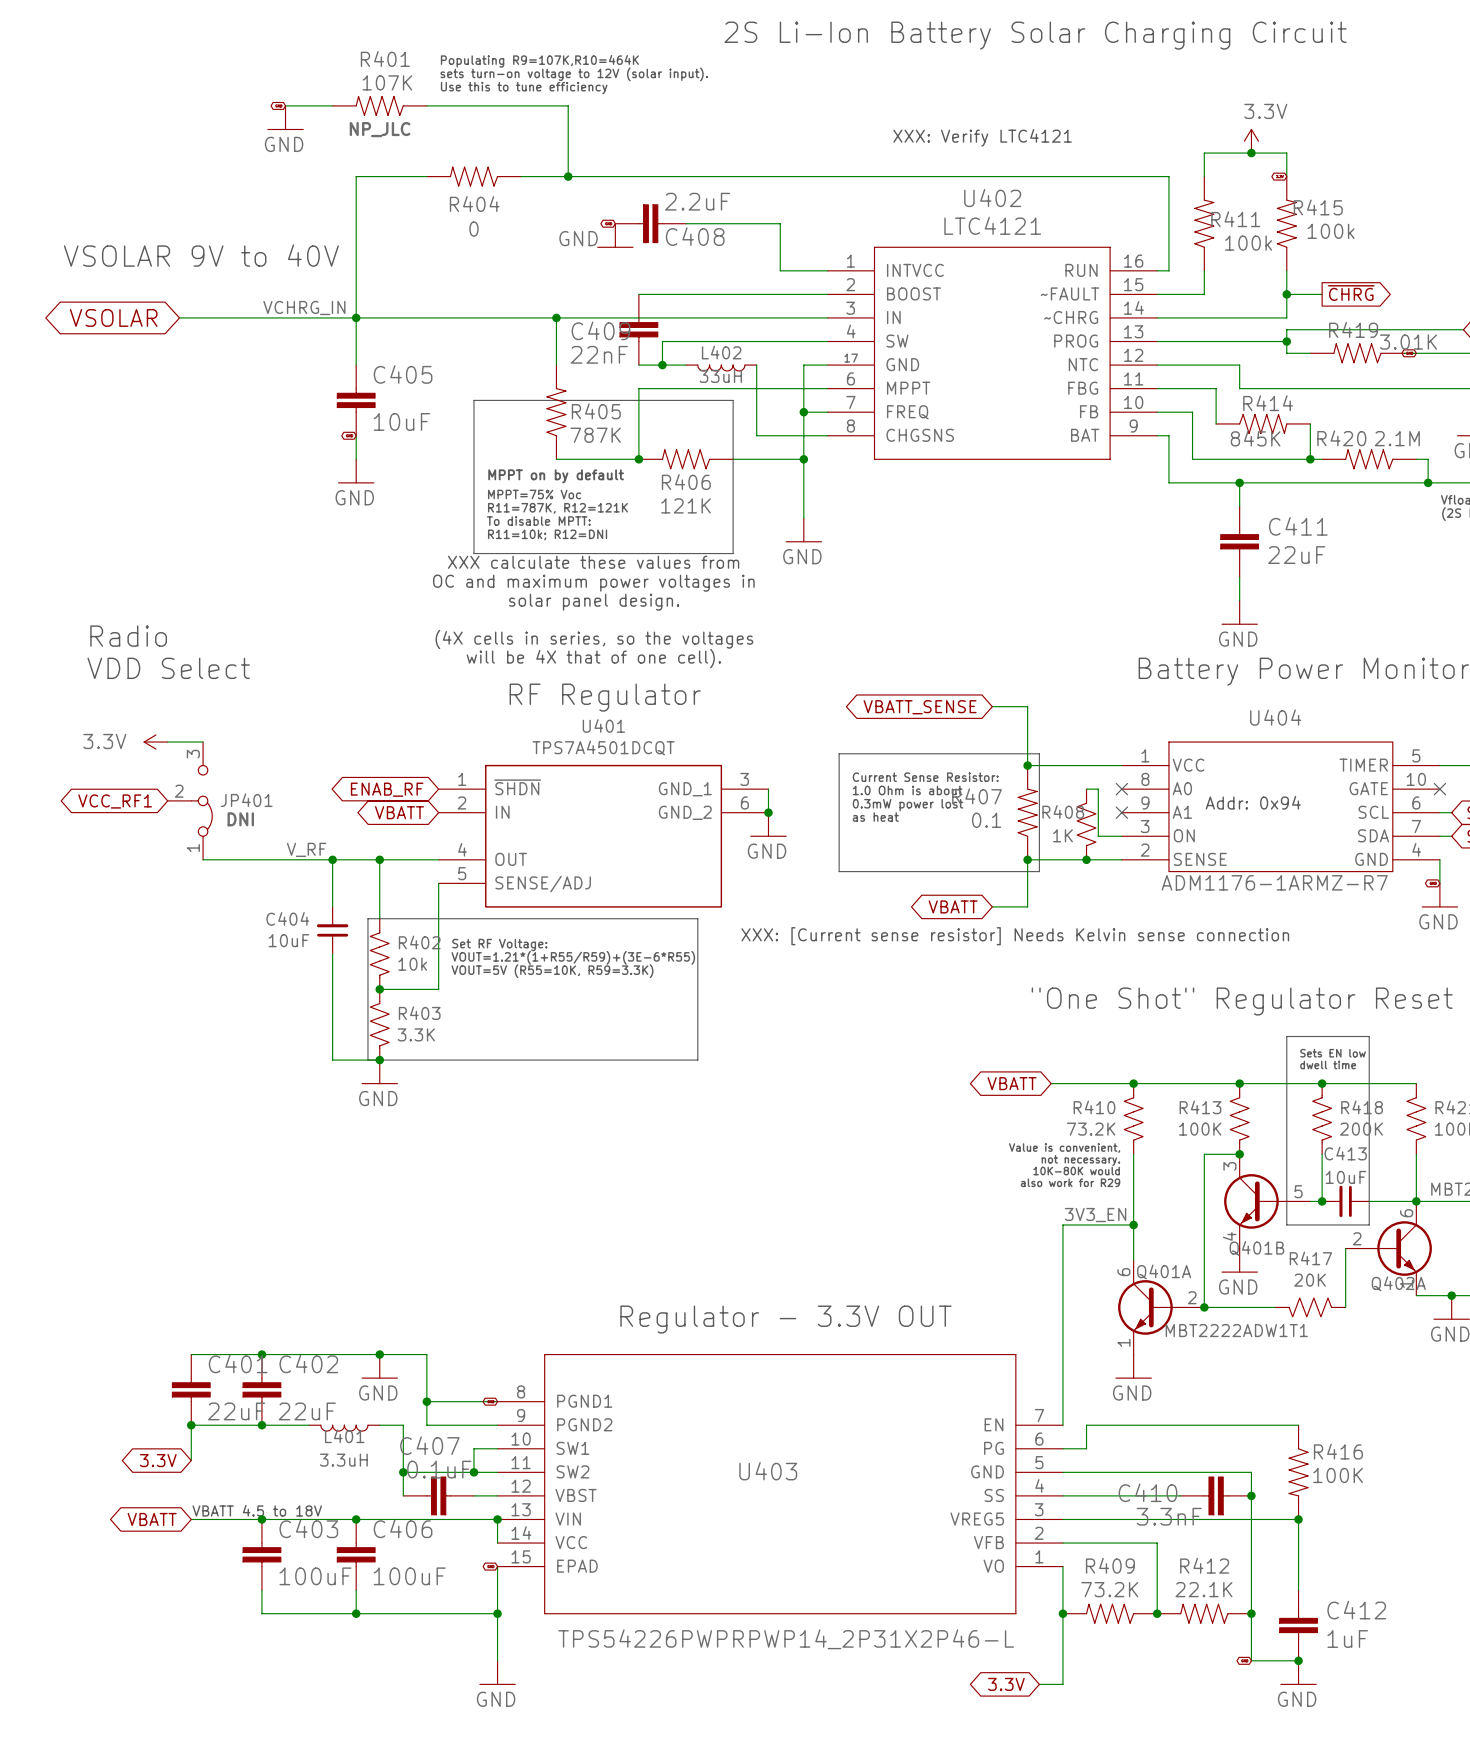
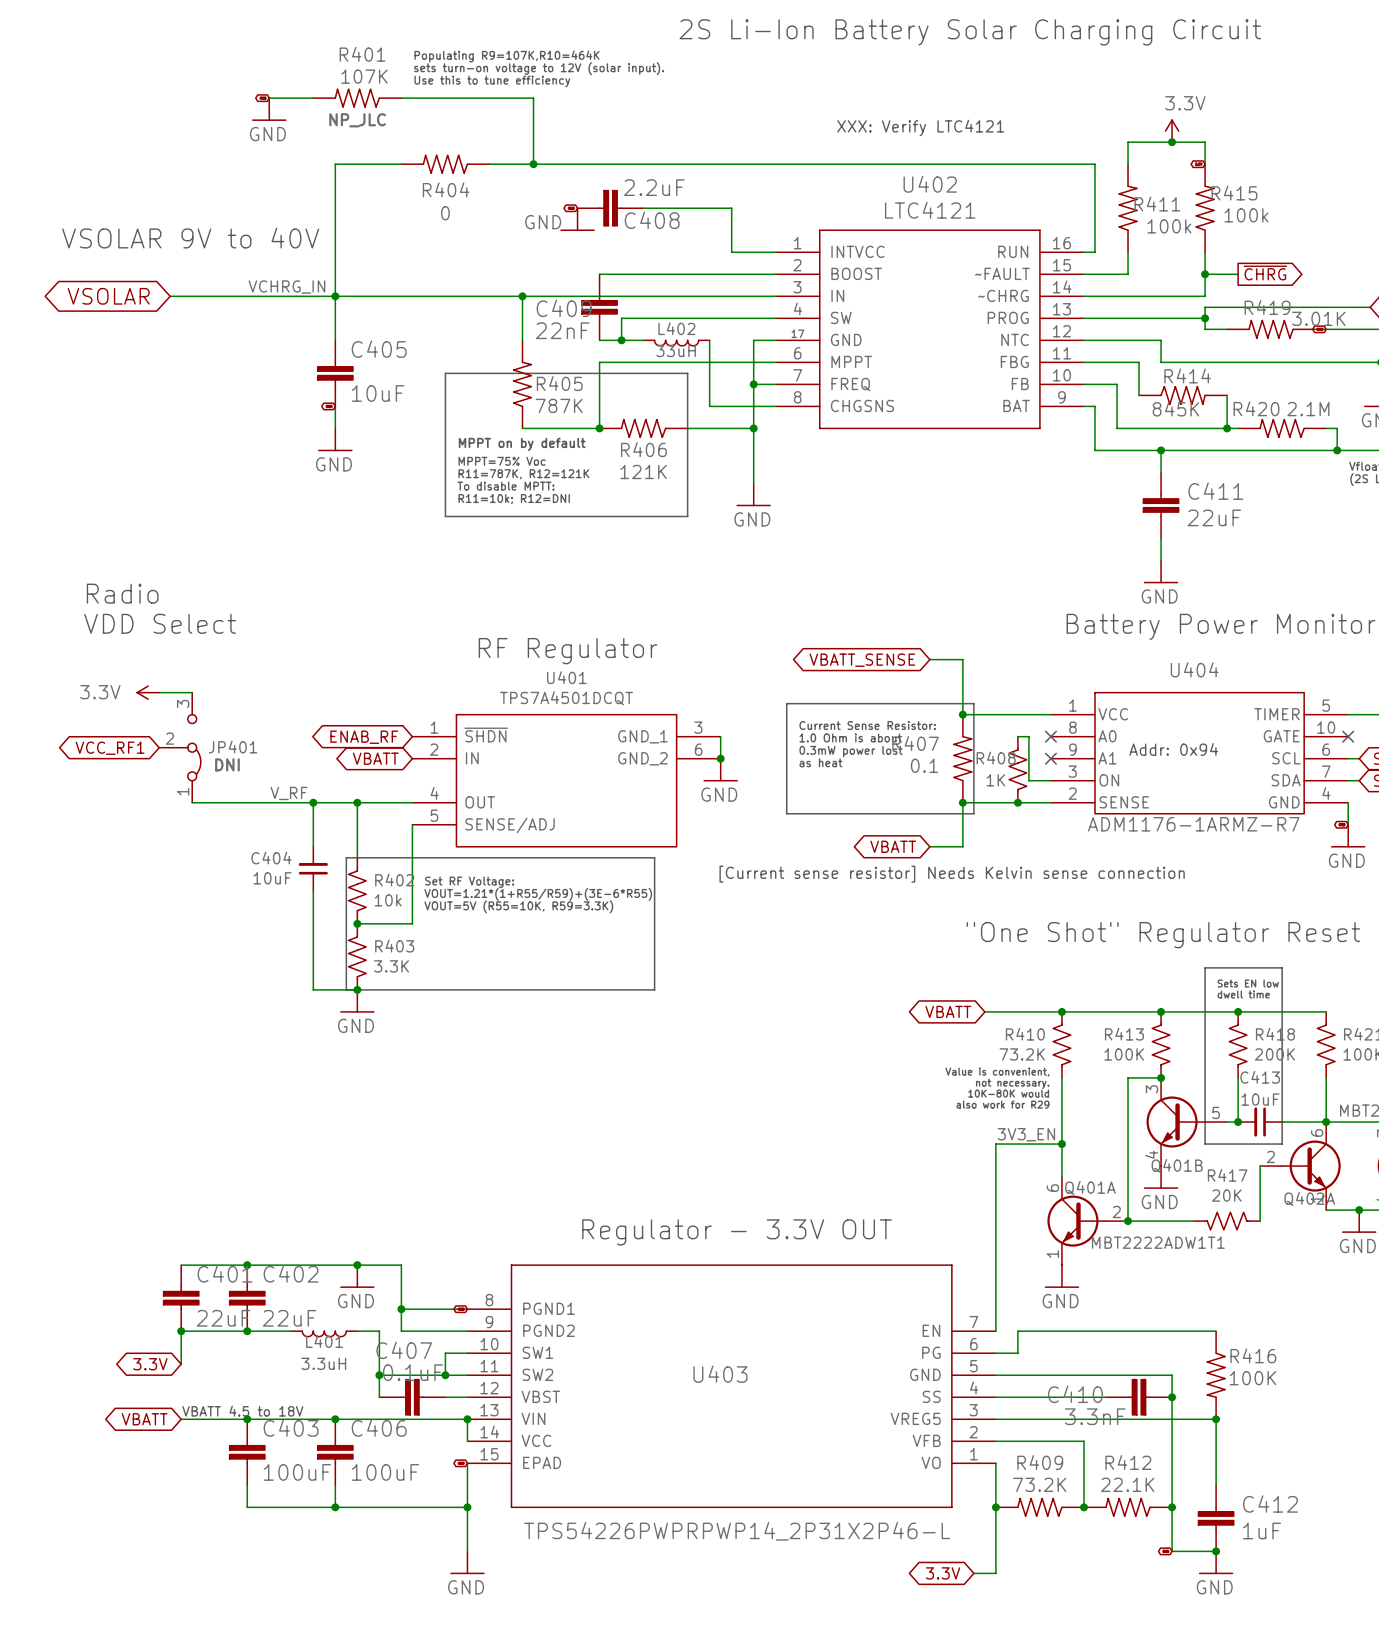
text: XXX calculate these values from (593, 562) -> none
text: OC and maximum power voltages in (593, 583) -> none
text: solar panel design. (594, 602) -> none
text: (4X cells in series, so the voltages (594, 639) -> none
text: will be 4X that of one cell). (593, 658) -> none
text: XXX: [Current sense resistor] Needs Kelvin sense connection (1015, 936) -> [Current sense resistor] Needs Kelvin sense connection (952, 874)

